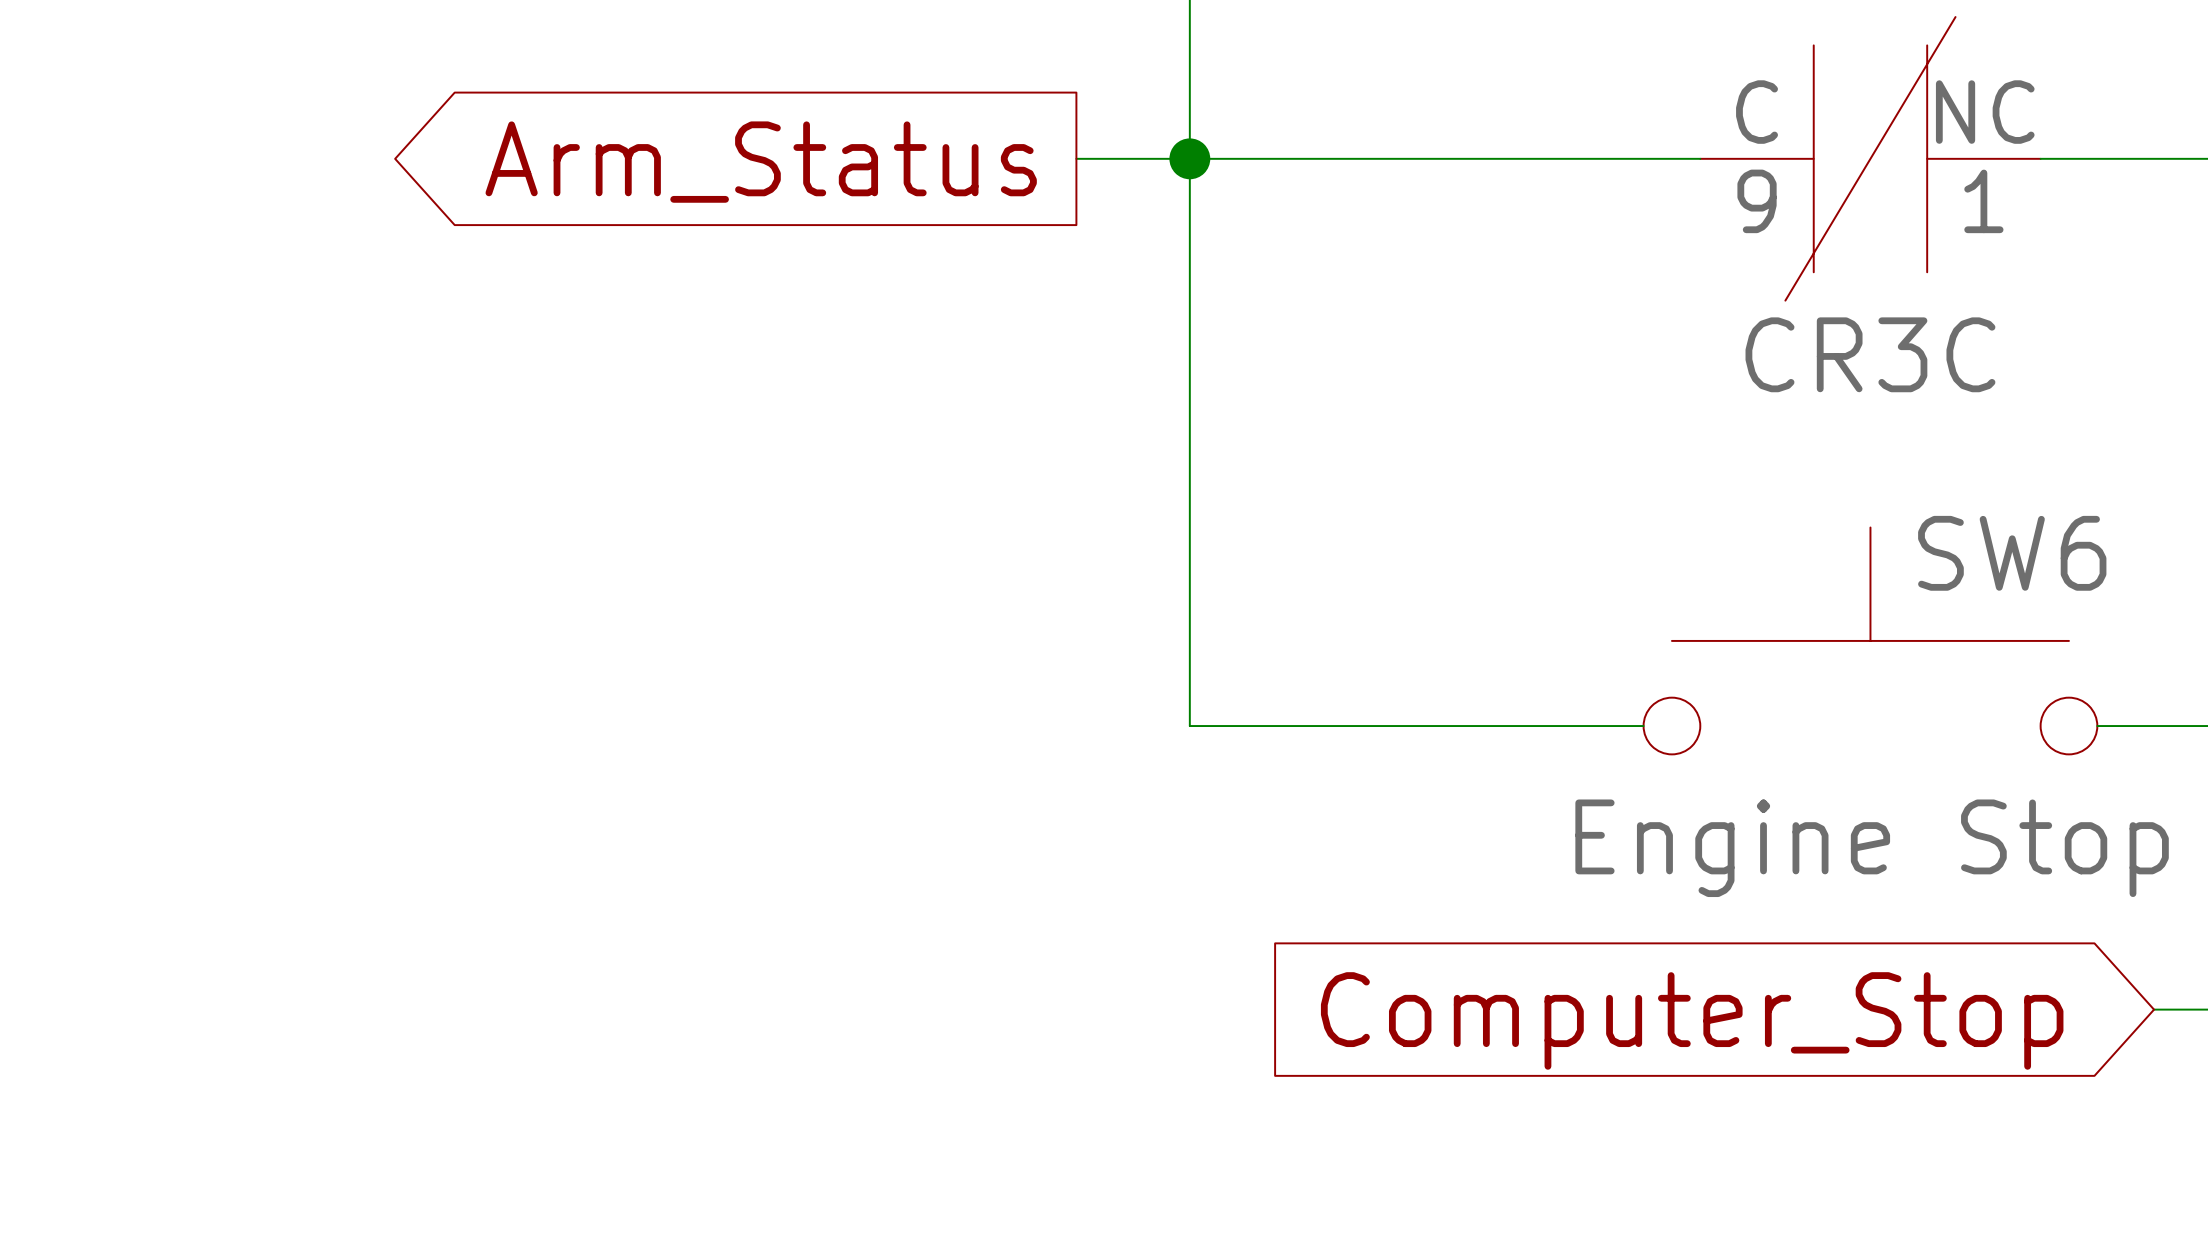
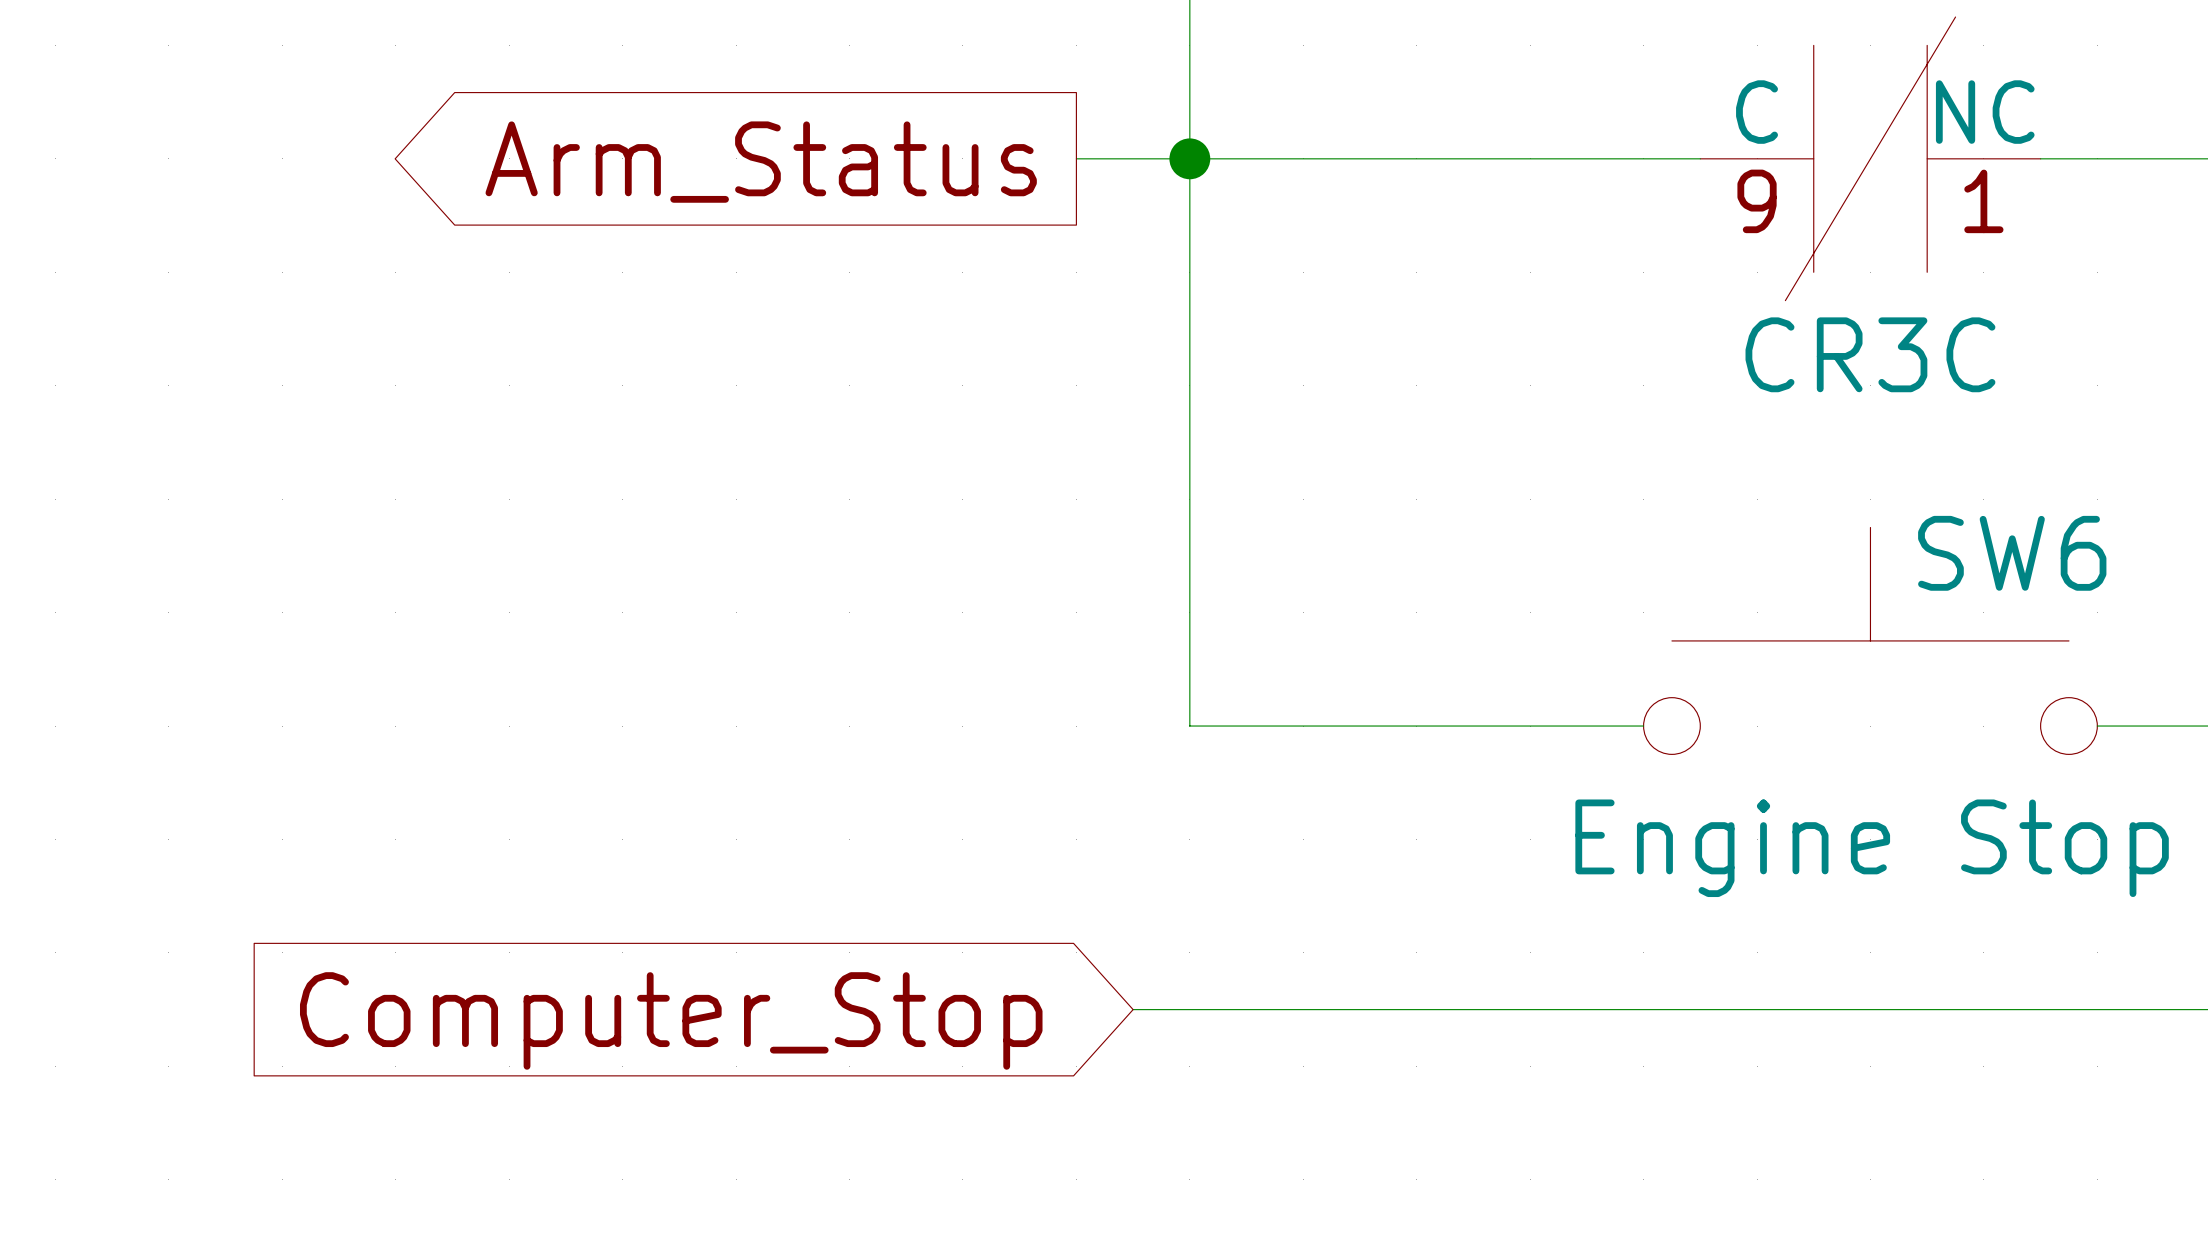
wire: none -> (1133, 1009) (2154, 1009)
global label position: Computer_Stop (1692, 1020) -> Computer_Stop (671, 1020)

